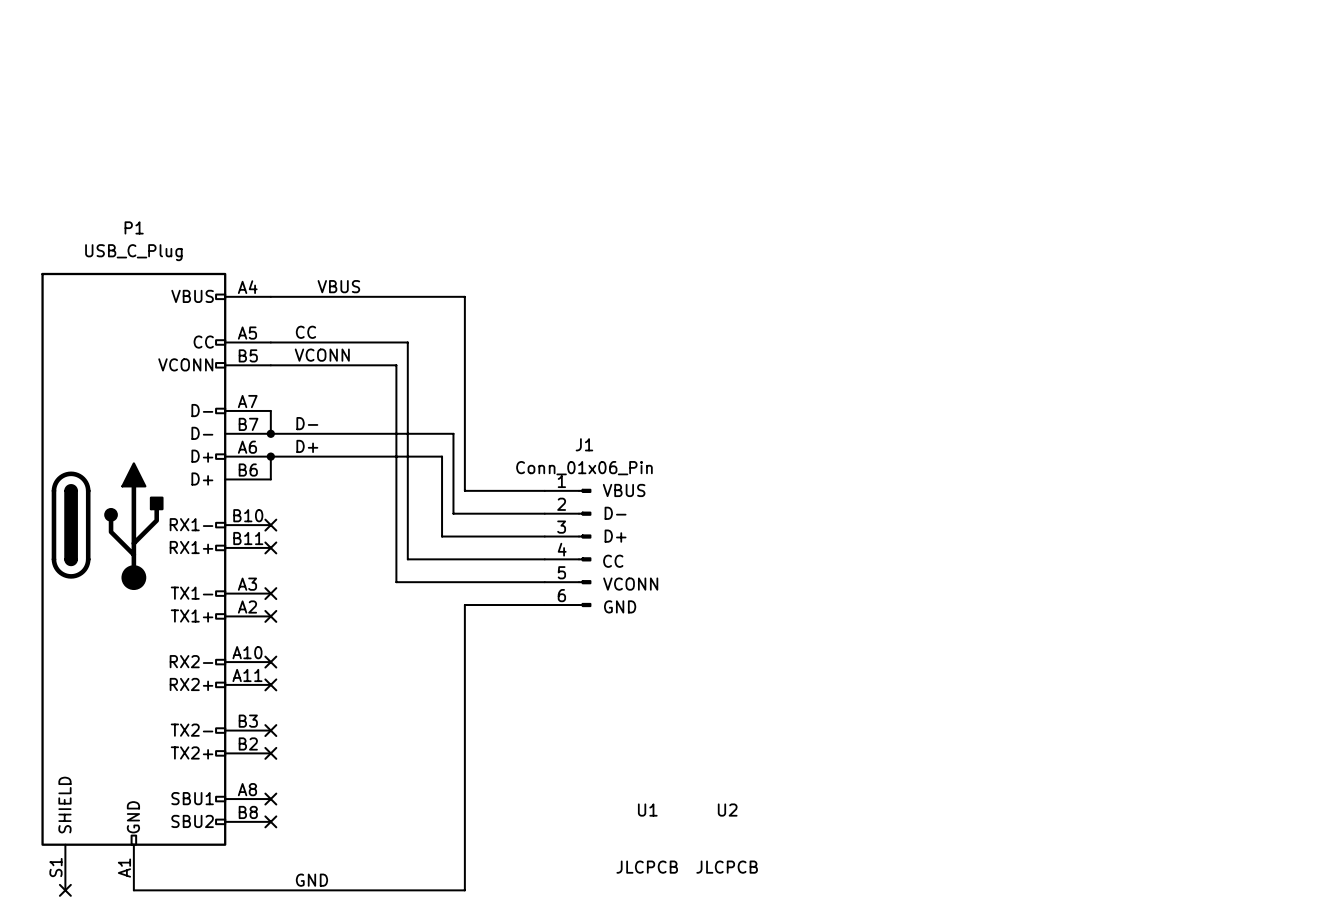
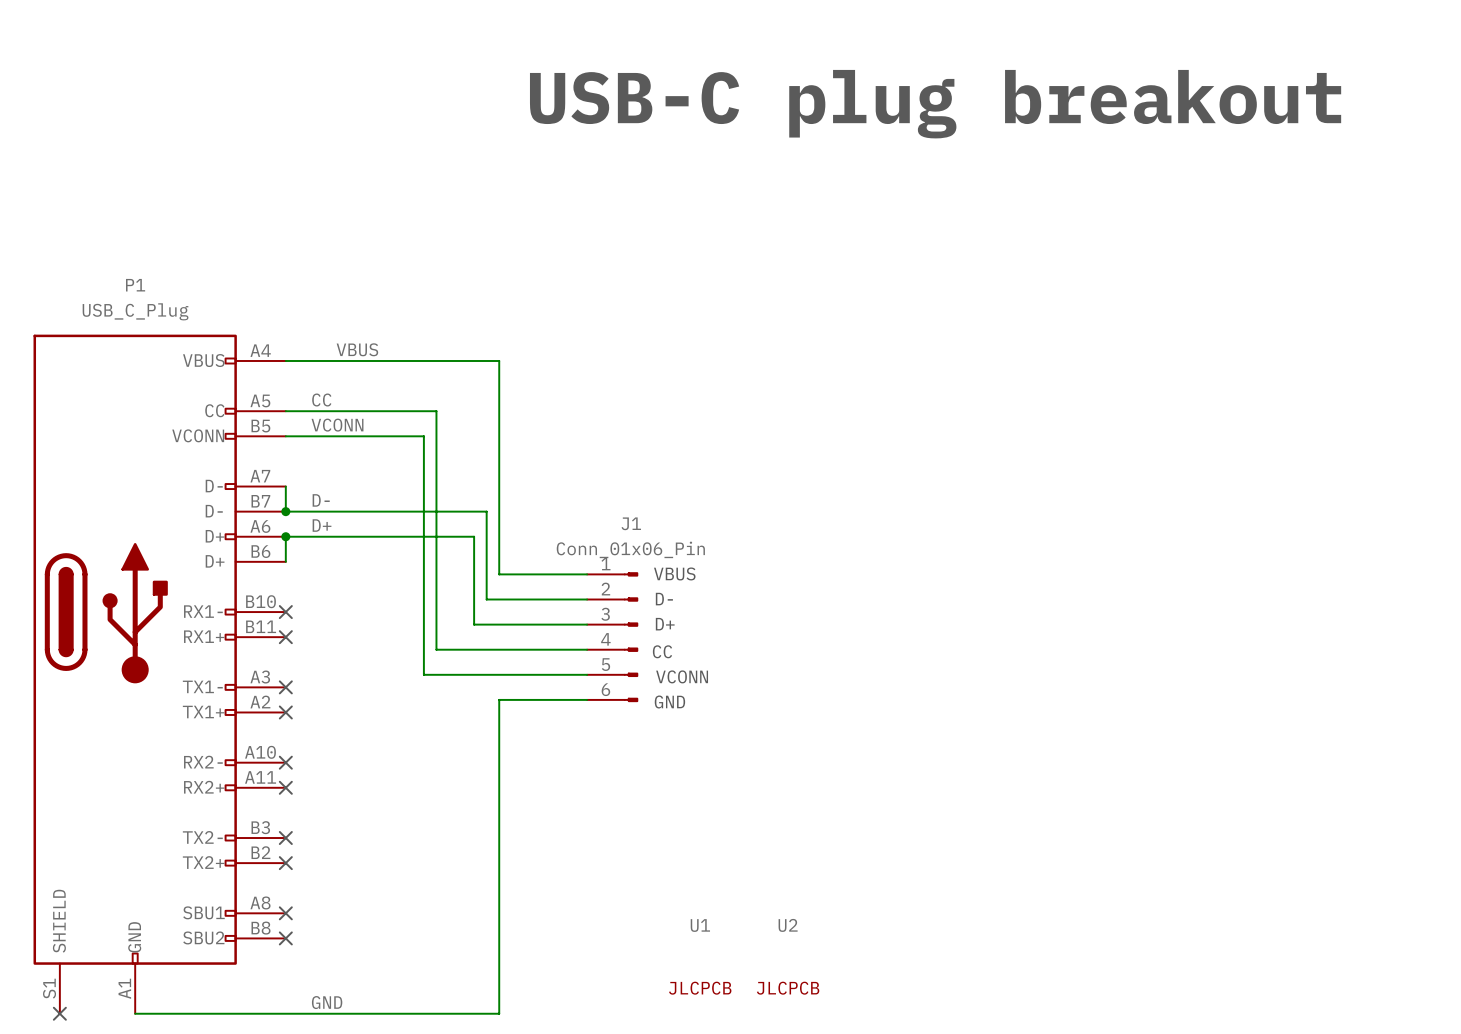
text: none -> USB-C plug breakout (935, 104)

